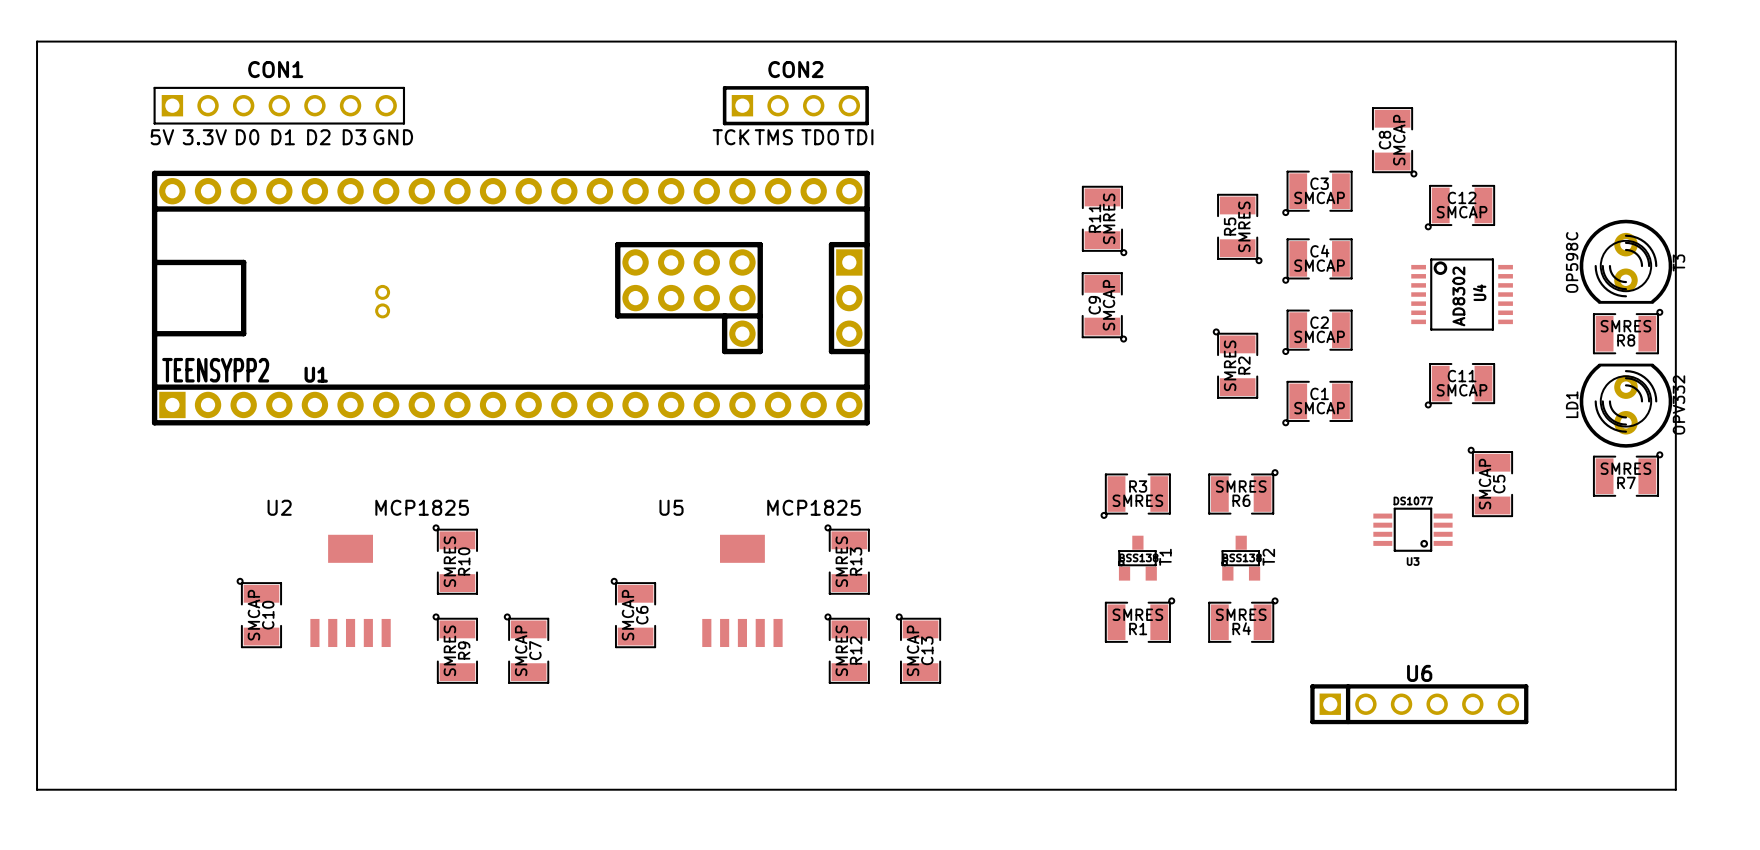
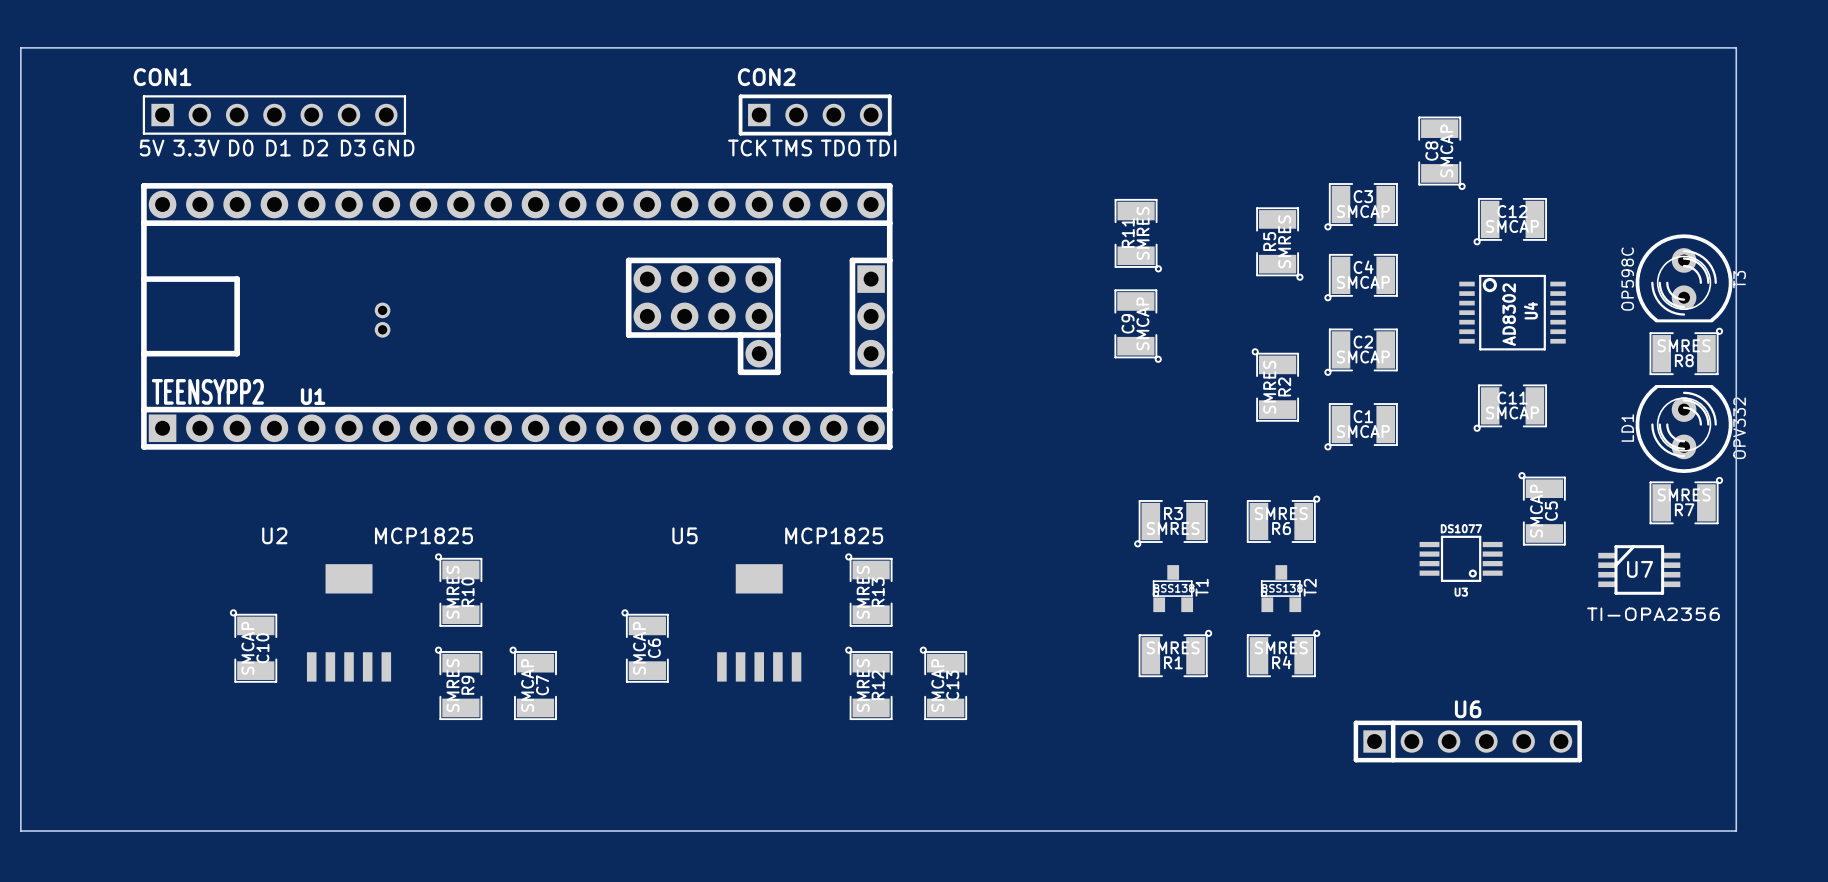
CON1 name position: CON1 (275, 69) -> CON1 (162, 77)
CON2 name position: CON2 (795, 69) -> CON2 (766, 77)
U7: none -> TI-OPA2356 (1639, 569)

